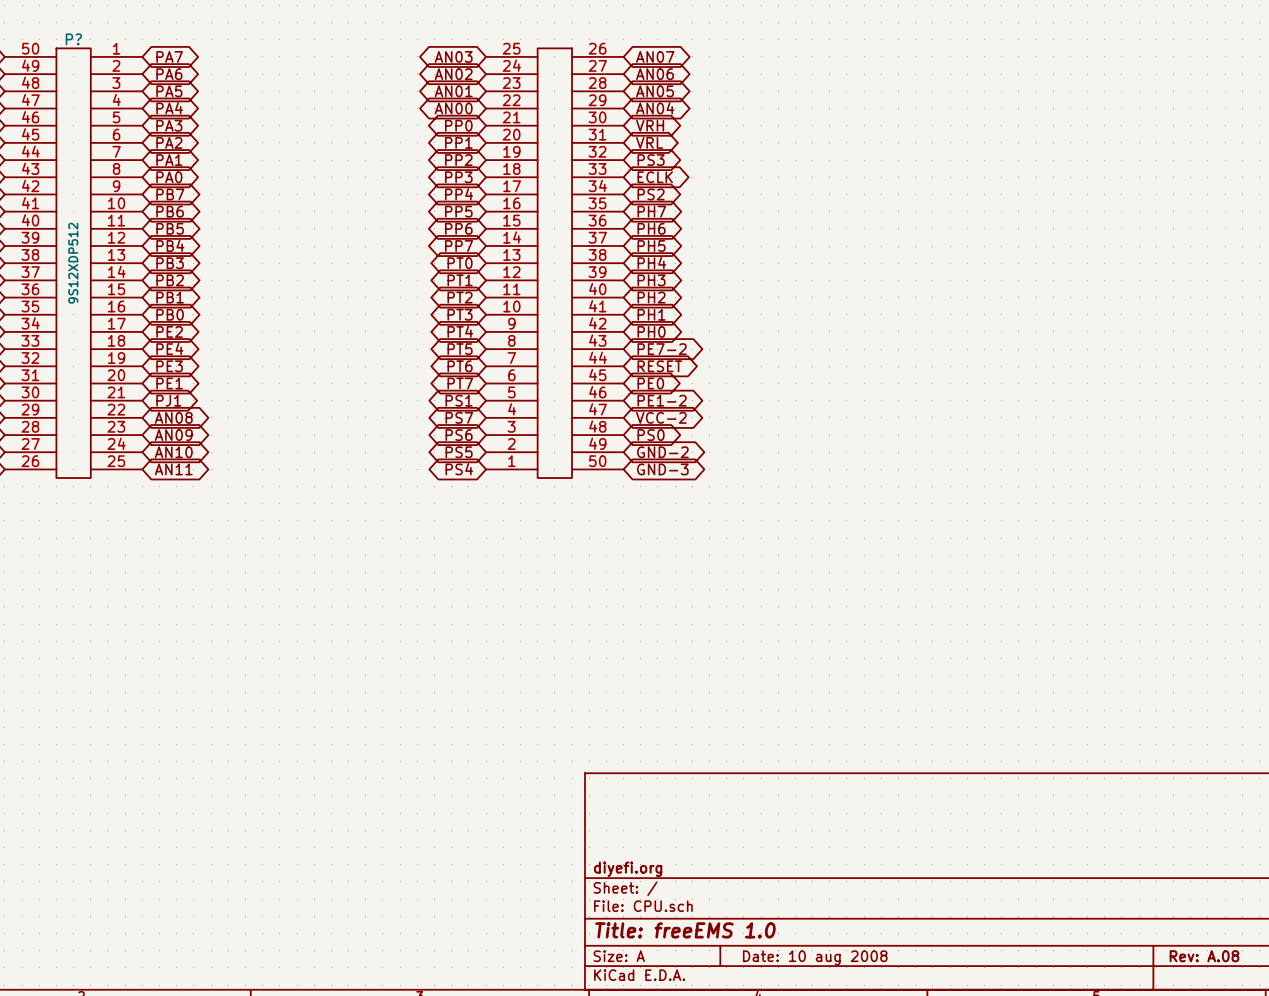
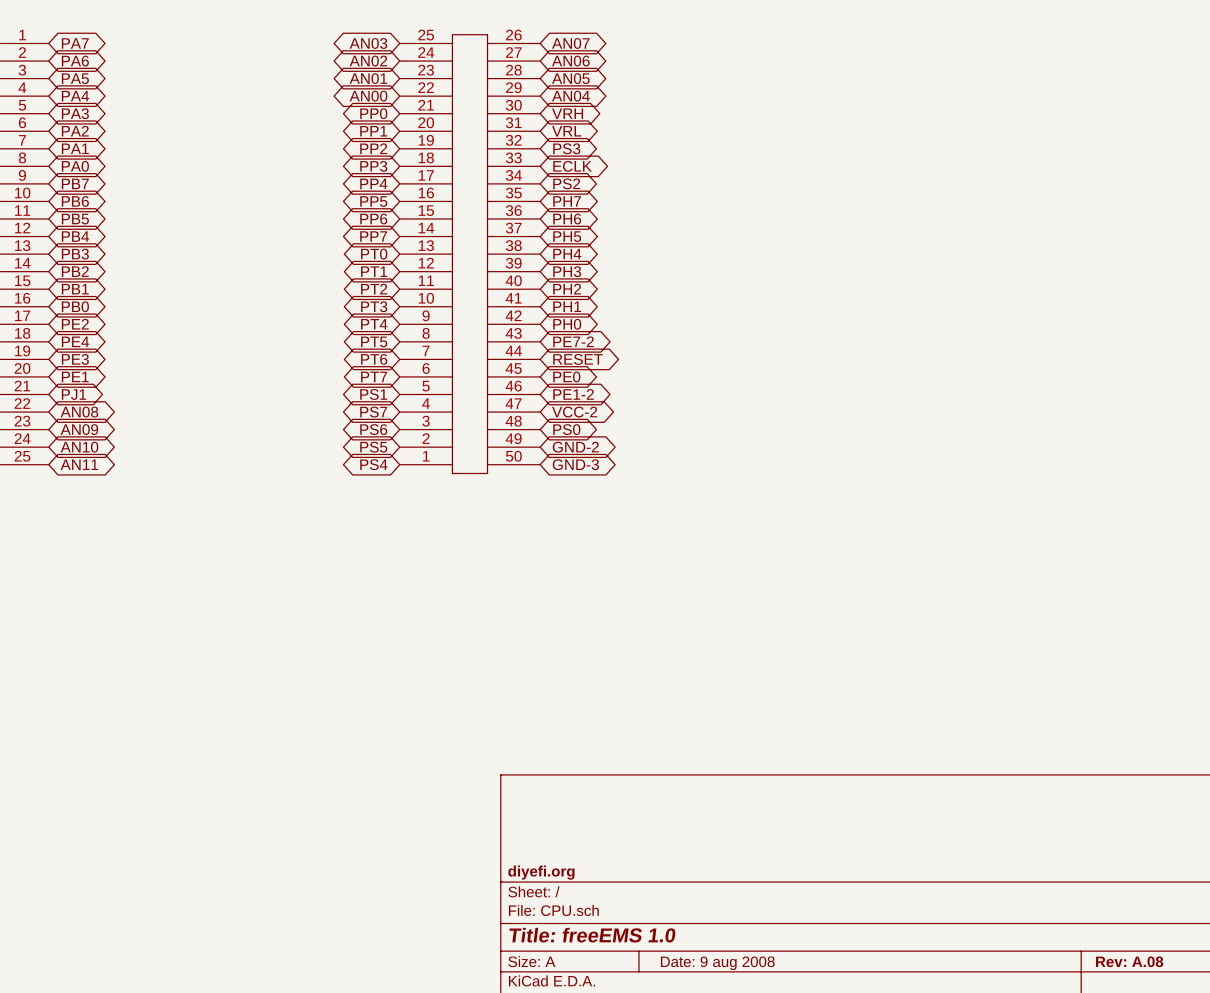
title block: Date: 10 aug 2008 (815, 957) -> Date: 9 aug 2008 (717, 963)

